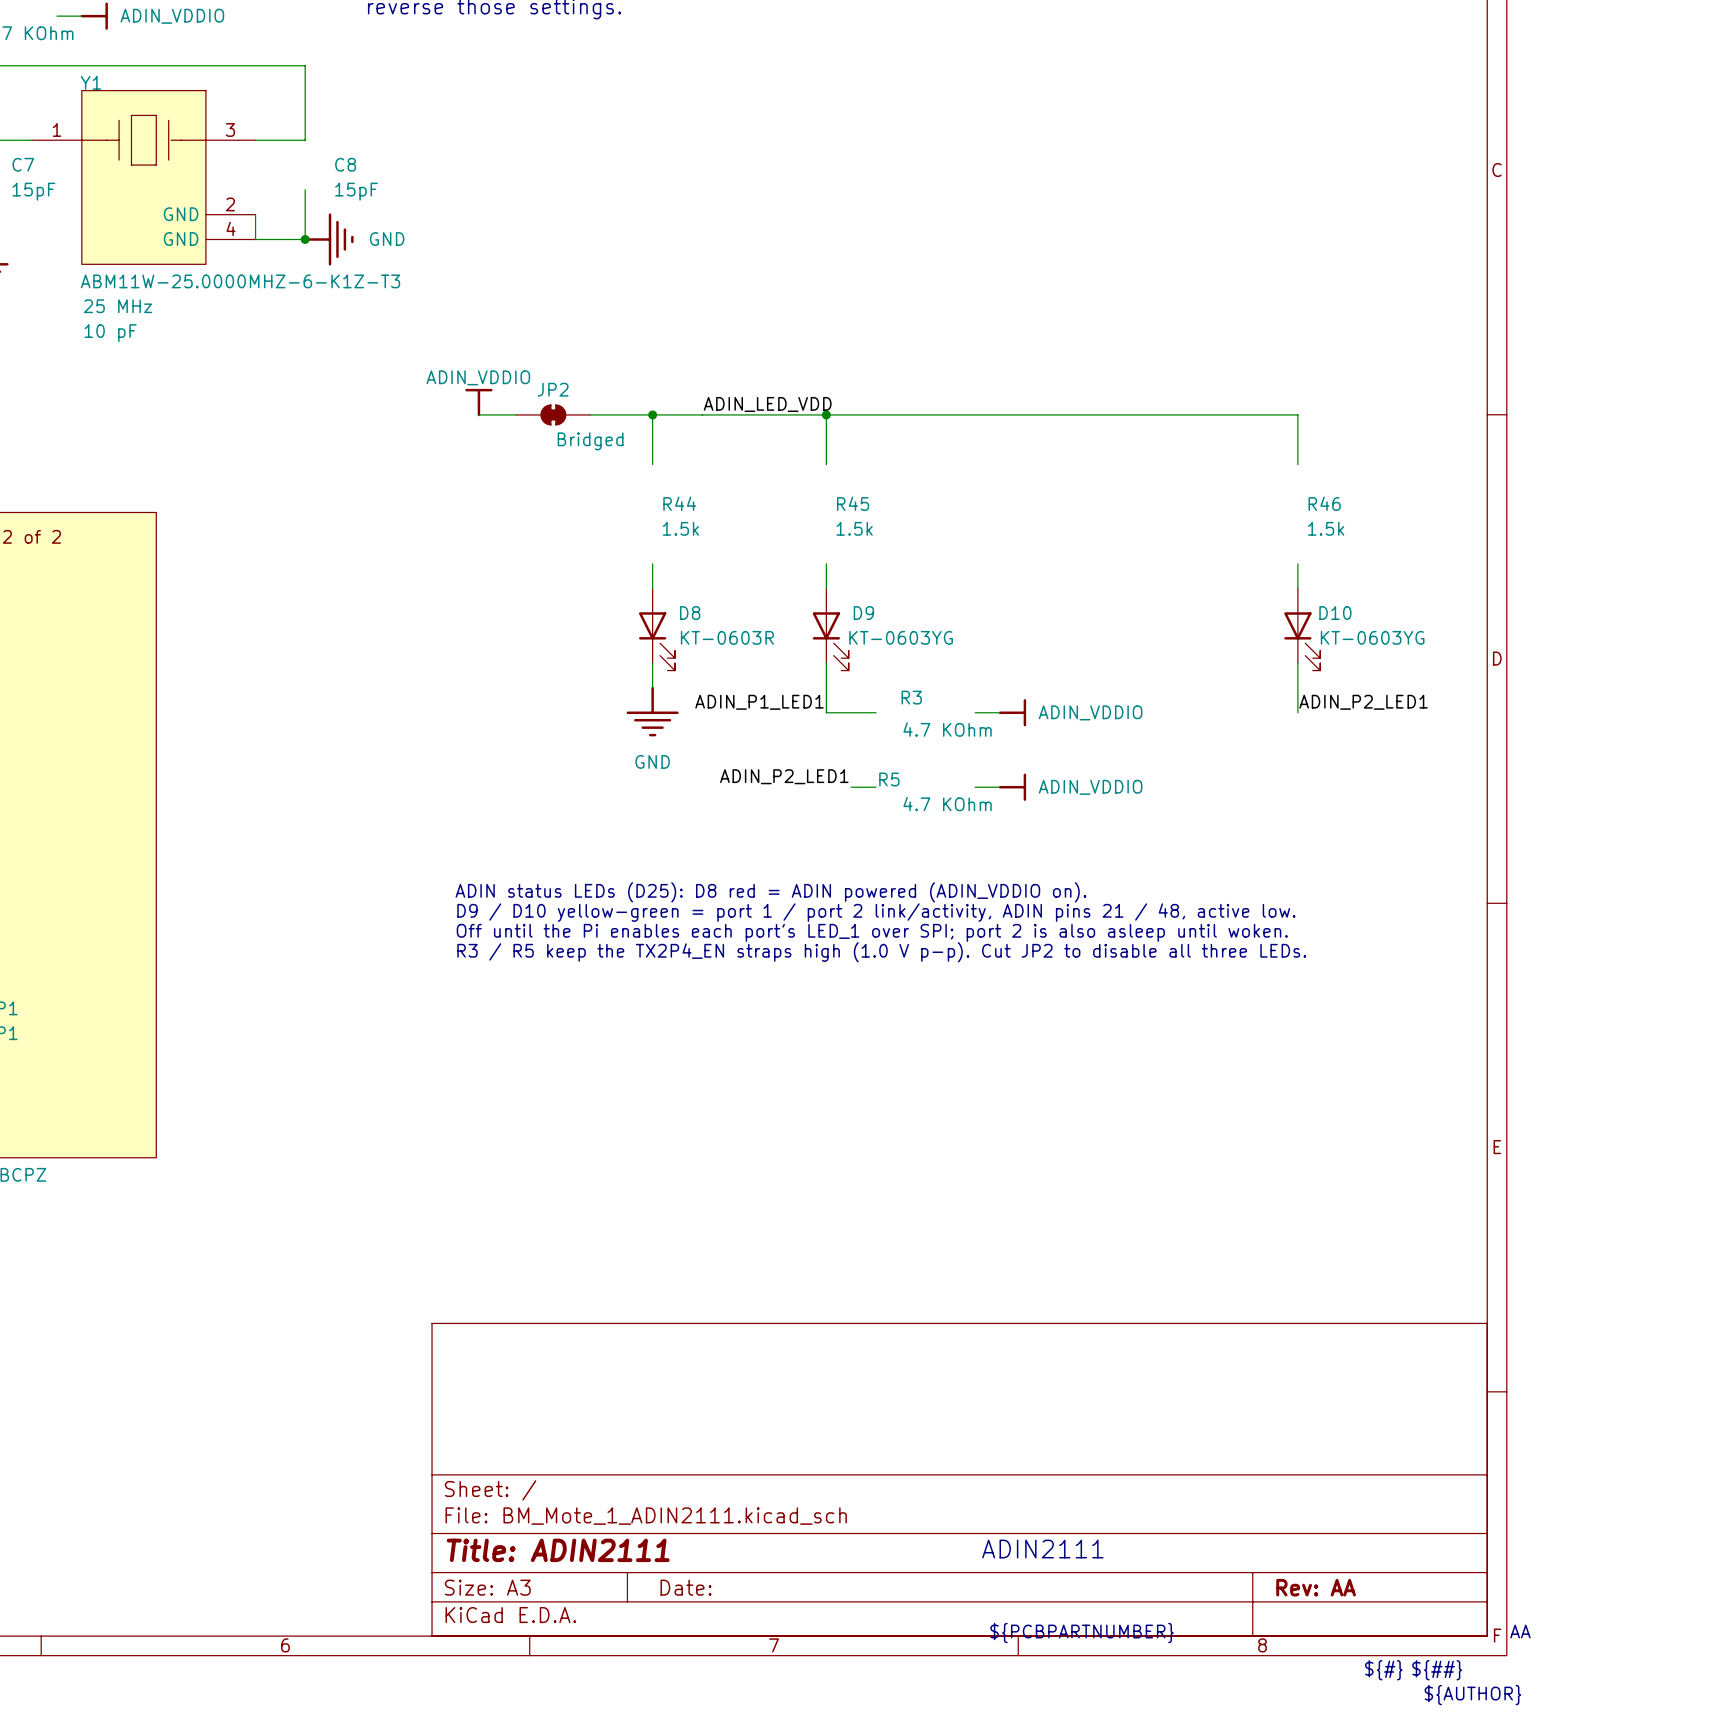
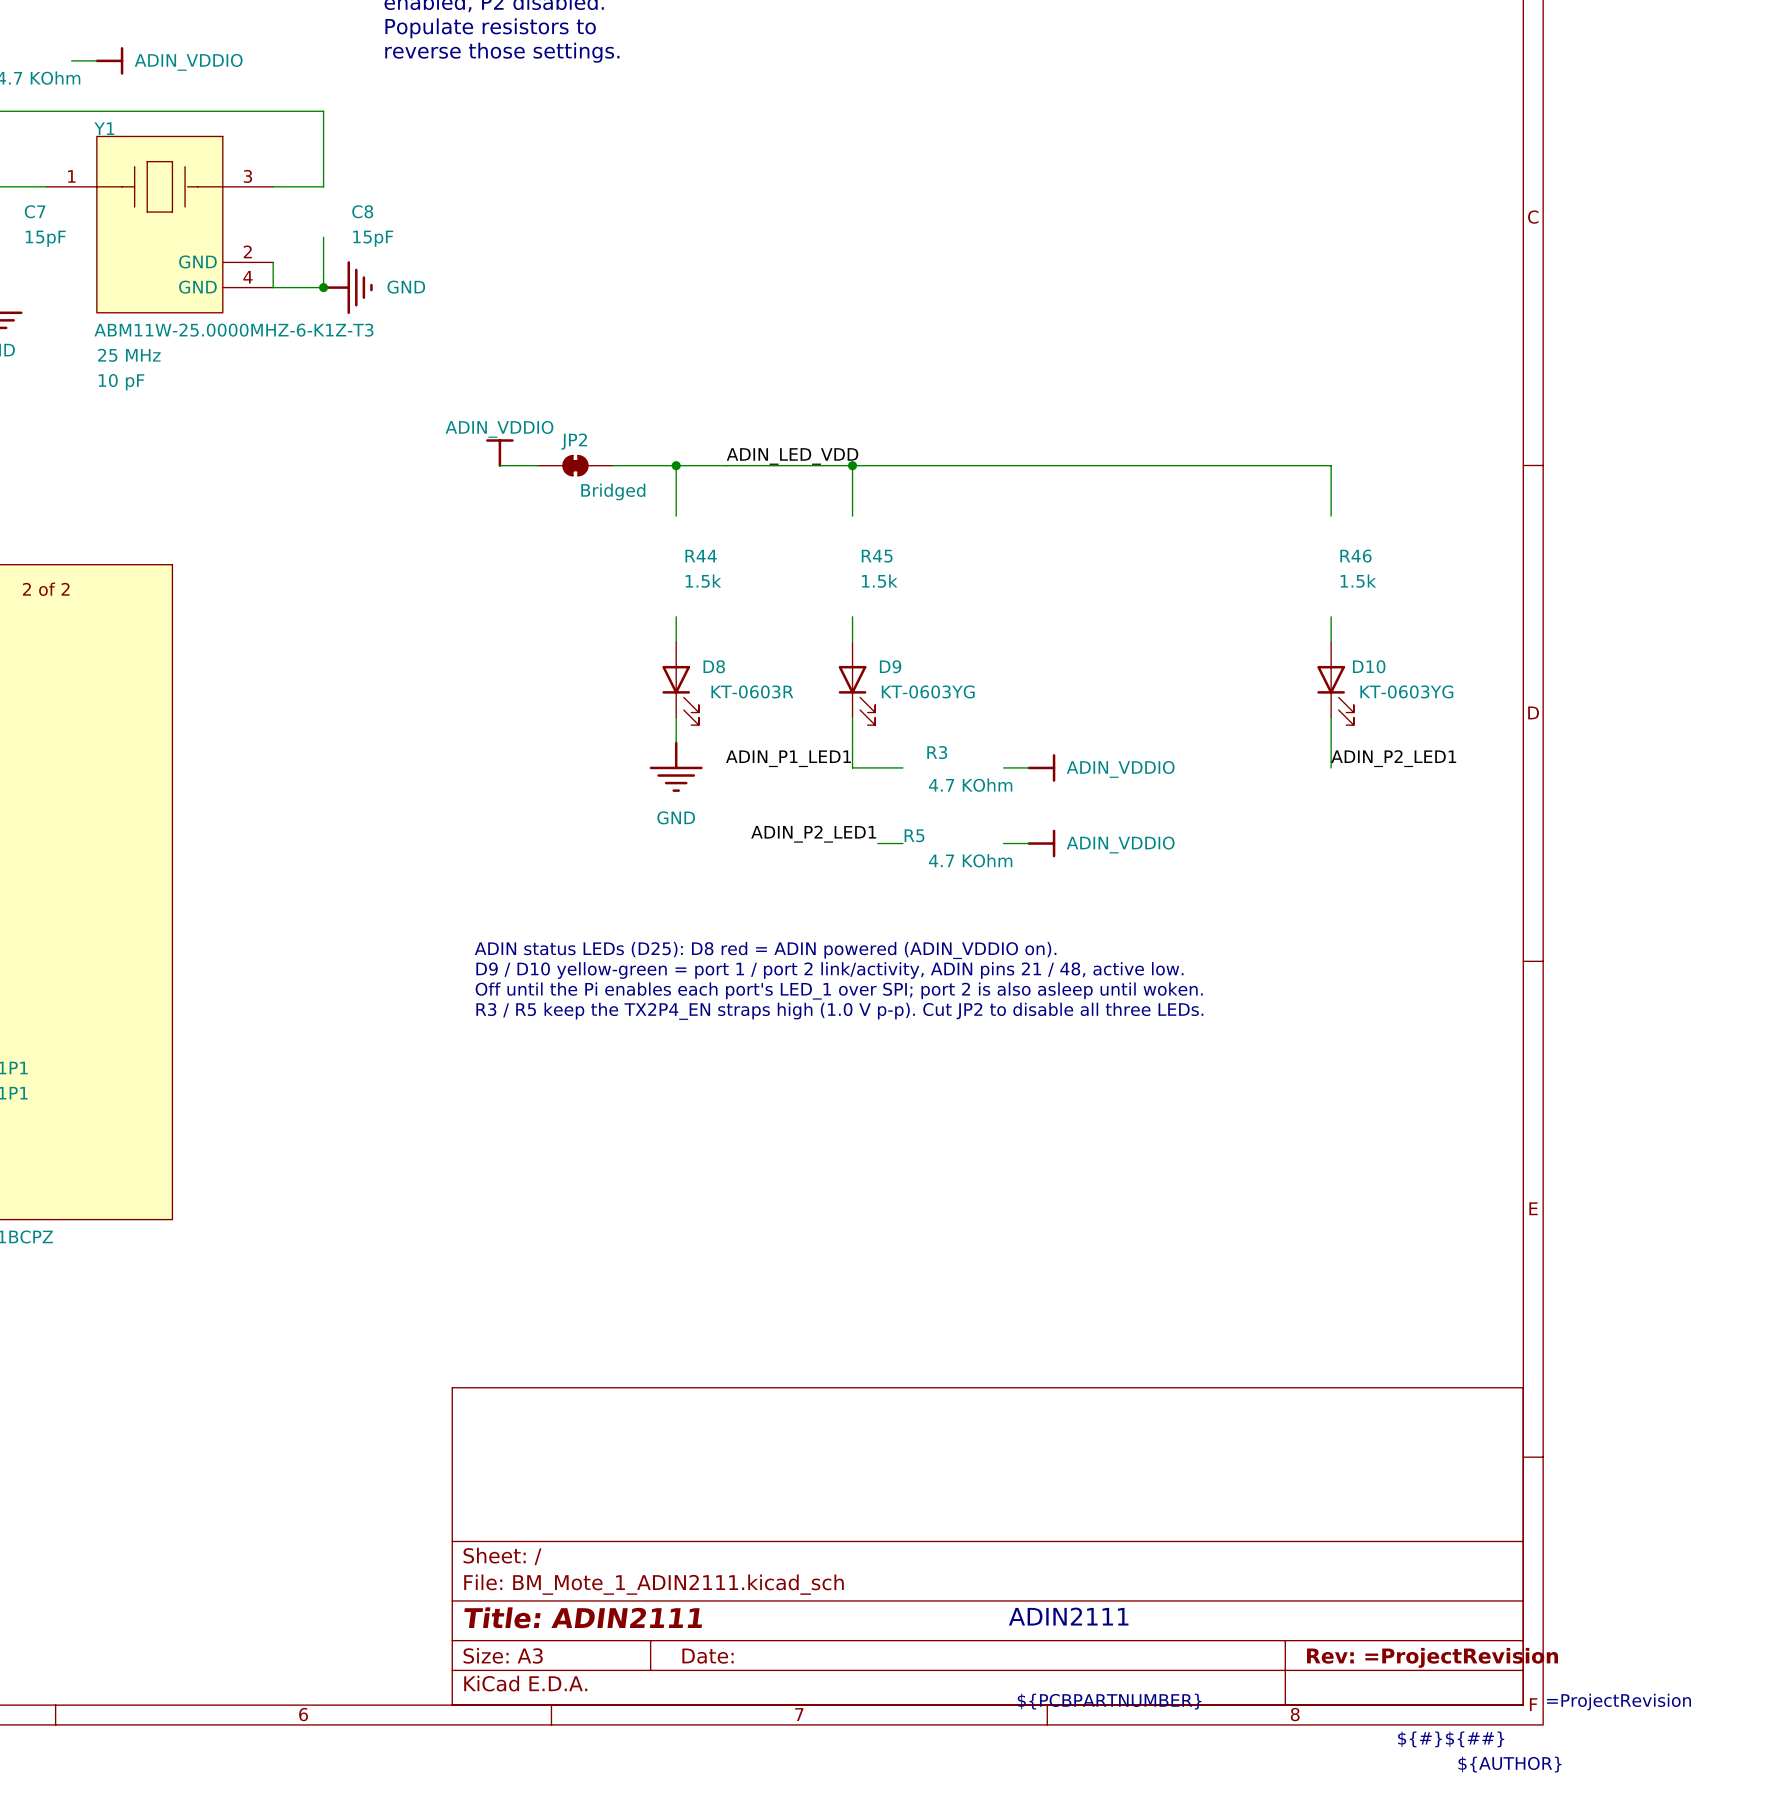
title block: Rev: AA (1316, 1587) -> Rev: =ProjectRevision (1432, 1657)
text: AA (1520, 1631) -> =ProjectRevision (1619, 1701)

